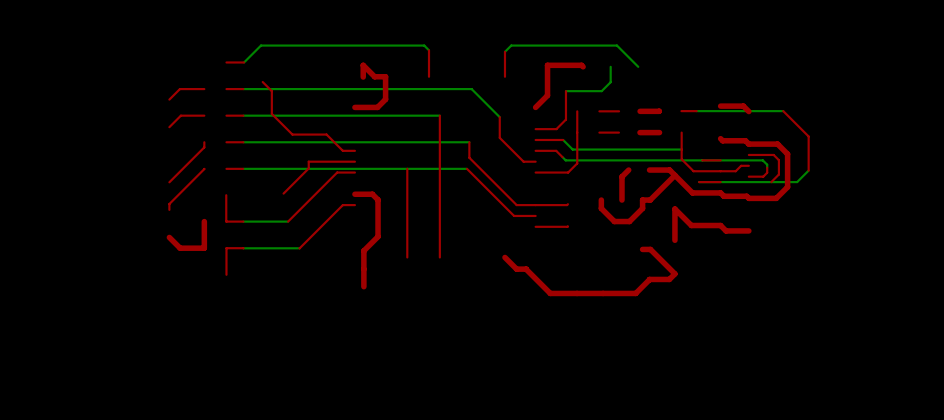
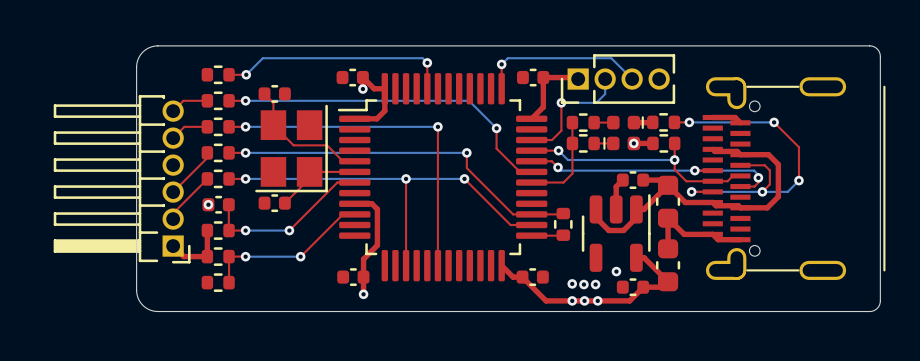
board edge: none -> (157, 45) (873, 46) (878, 50) (880, 56) (879, 304) (876, 309) (869, 311) (150, 310) (141, 303) (136, 292) (136, 67) (137, 60) (142, 52) (148, 47) (157, 45)
via: none -> (427, 62)
via: none -> (501, 64)
part: none -> (218, 74)
via: none -> (246, 74)
part: none -> (352, 77)
part: none -> (533, 77)
part: none -> (617, 79)
via: none -> (362, 89)
part: none -> (274, 93)
part: none -> (218, 100)
via: none -> (245, 100)
via: none -> (561, 102)
part: none -> (583, 122)
part: none -> (625, 122)
part: none -> (663, 122)
via: none -> (689, 122)
via: none -> (774, 122)
part: none -> (218, 126)
via: none -> (245, 126)
via: none -> (437, 126)
via: none -> (496, 128)
part: none -> (583, 143)
part: none -> (621, 143)
via: none -> (633, 143)
part: none -> (663, 143)
part: none -> (291, 148)
via: none -> (558, 150)
part: none -> (218, 152)
via: none -> (245, 152)
via: none -> (466, 152)
via: none -> (674, 160)
via: none -> (558, 167)
via: none -> (694, 170)
part: none -> (442, 177)
via: none -> (758, 177)
part: none -> (218, 178)
via: none -> (245, 178)
via: none -> (406, 178)
via: none -> (464, 178)
part: none -> (794, 178)
part: none -> (122, 179)
part: none -> (633, 180)
via: none -> (798, 180)
via: none -> (691, 191)
via: none -> (762, 191)
part: none -> (668, 201)
part: none -> (274, 203)
via: none -> (208, 204)
part: none -> (218, 204)
part: none -> (563, 224)
part: none -> (218, 230)
via: none -> (245, 230)
via: none -> (289, 230)
part: none -> (616, 233)
part: none -> (218, 256)
via: none -> (245, 256)
via: none -> (300, 256)
part: none -> (668, 265)
via: none -> (616, 271)
part: none -> (353, 277)
part: none -> (532, 277)
part: none -> (218, 282)
via: none -> (572, 283)
via: none -> (583, 284)
via: none -> (595, 284)
part: none -> (633, 287)
via: none -> (363, 294)
via: none -> (572, 300)
via: none -> (584, 300)
via: none -> (597, 300)

